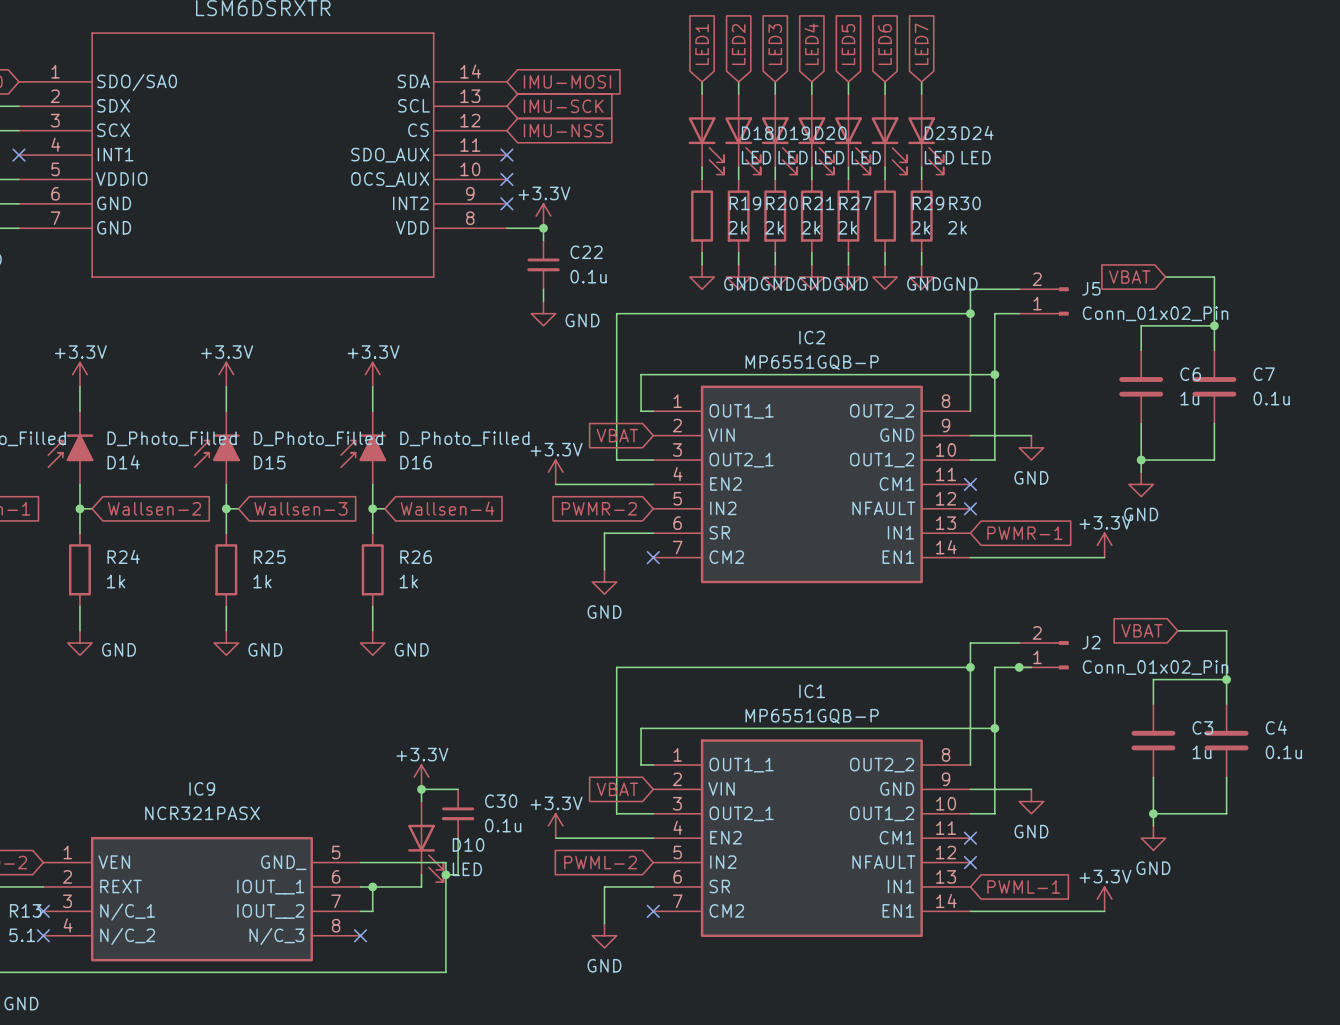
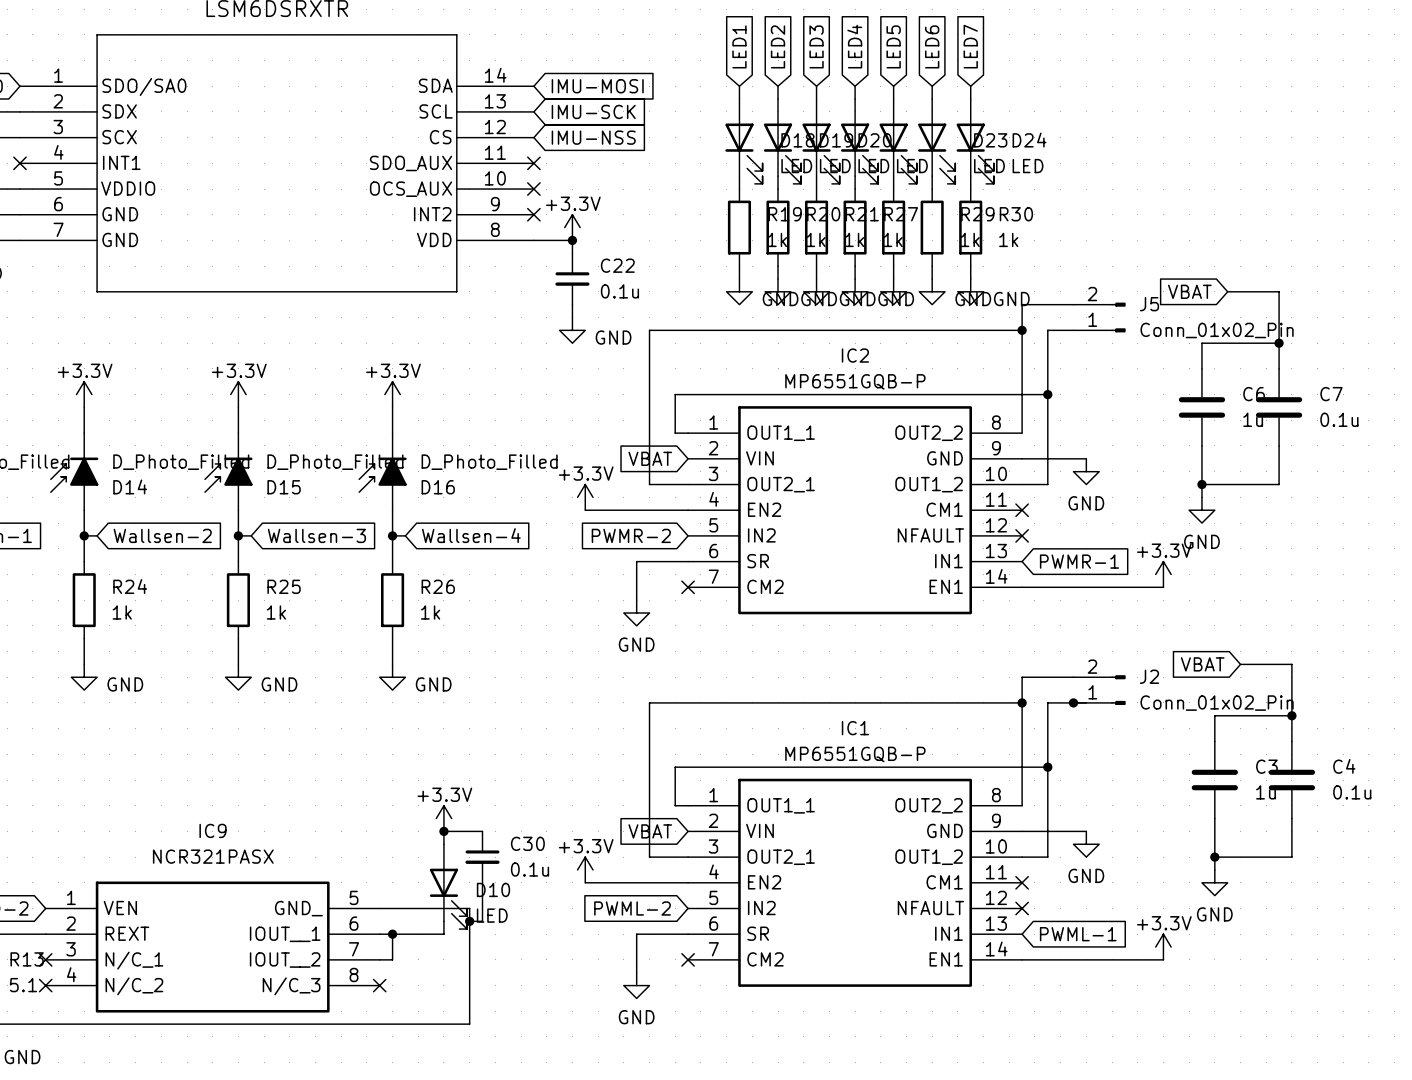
R19 value: 2k (737, 227) -> 1k (777, 239)
R20 value: 2k (774, 227) -> 1k (816, 239)
R21 value: 2k (811, 227) -> 1k (854, 239)
R27 value: 2k (847, 227) -> 1k (893, 239)
R29 value: 2k (920, 227) -> 1k (970, 239)
R30 value: 2k (957, 227) -> 1k (1008, 239)

